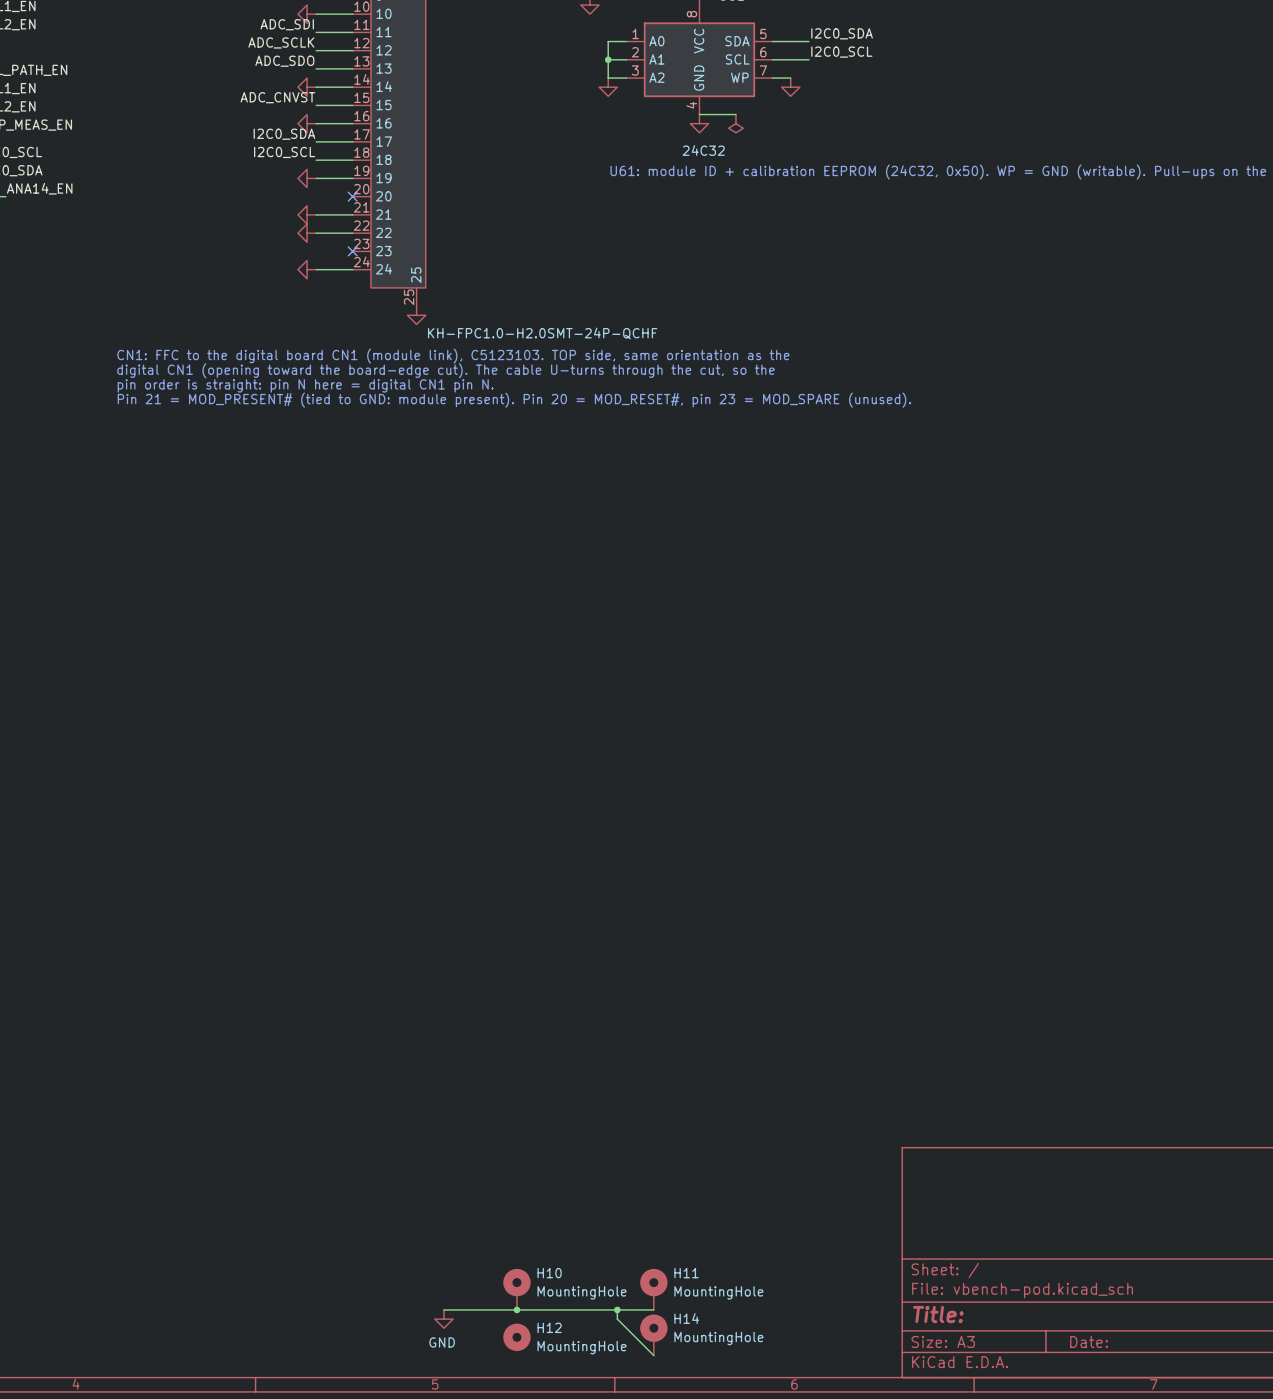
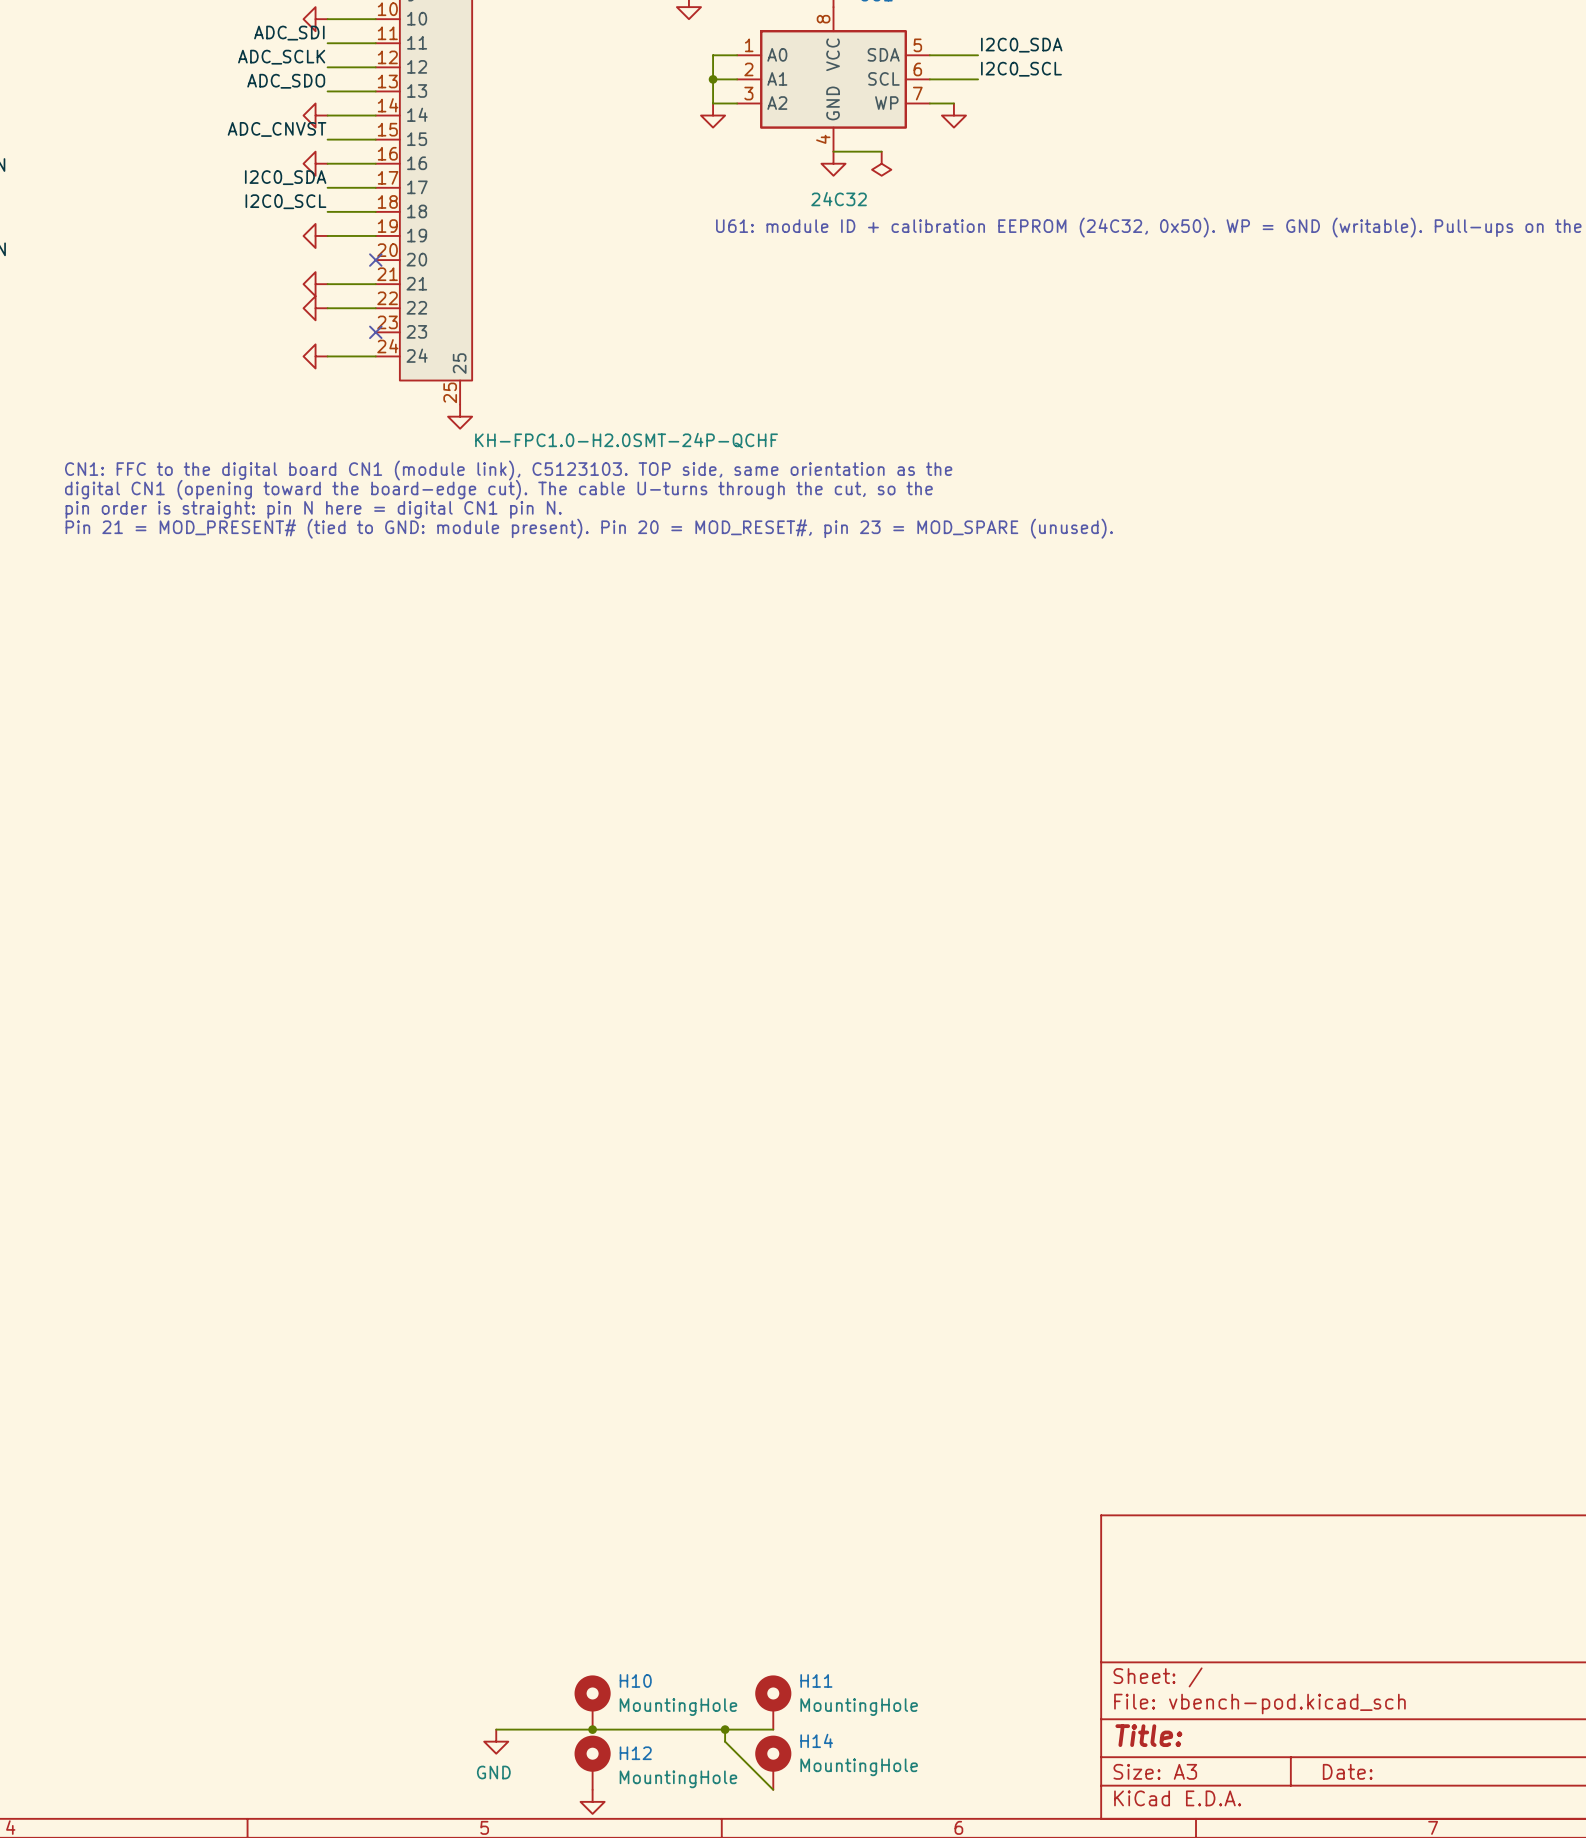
H12 symbol: [503, 1323, 531, 1352] -> [574, 1735, 611, 1790]
power symbol: none -> (592, 1801)

